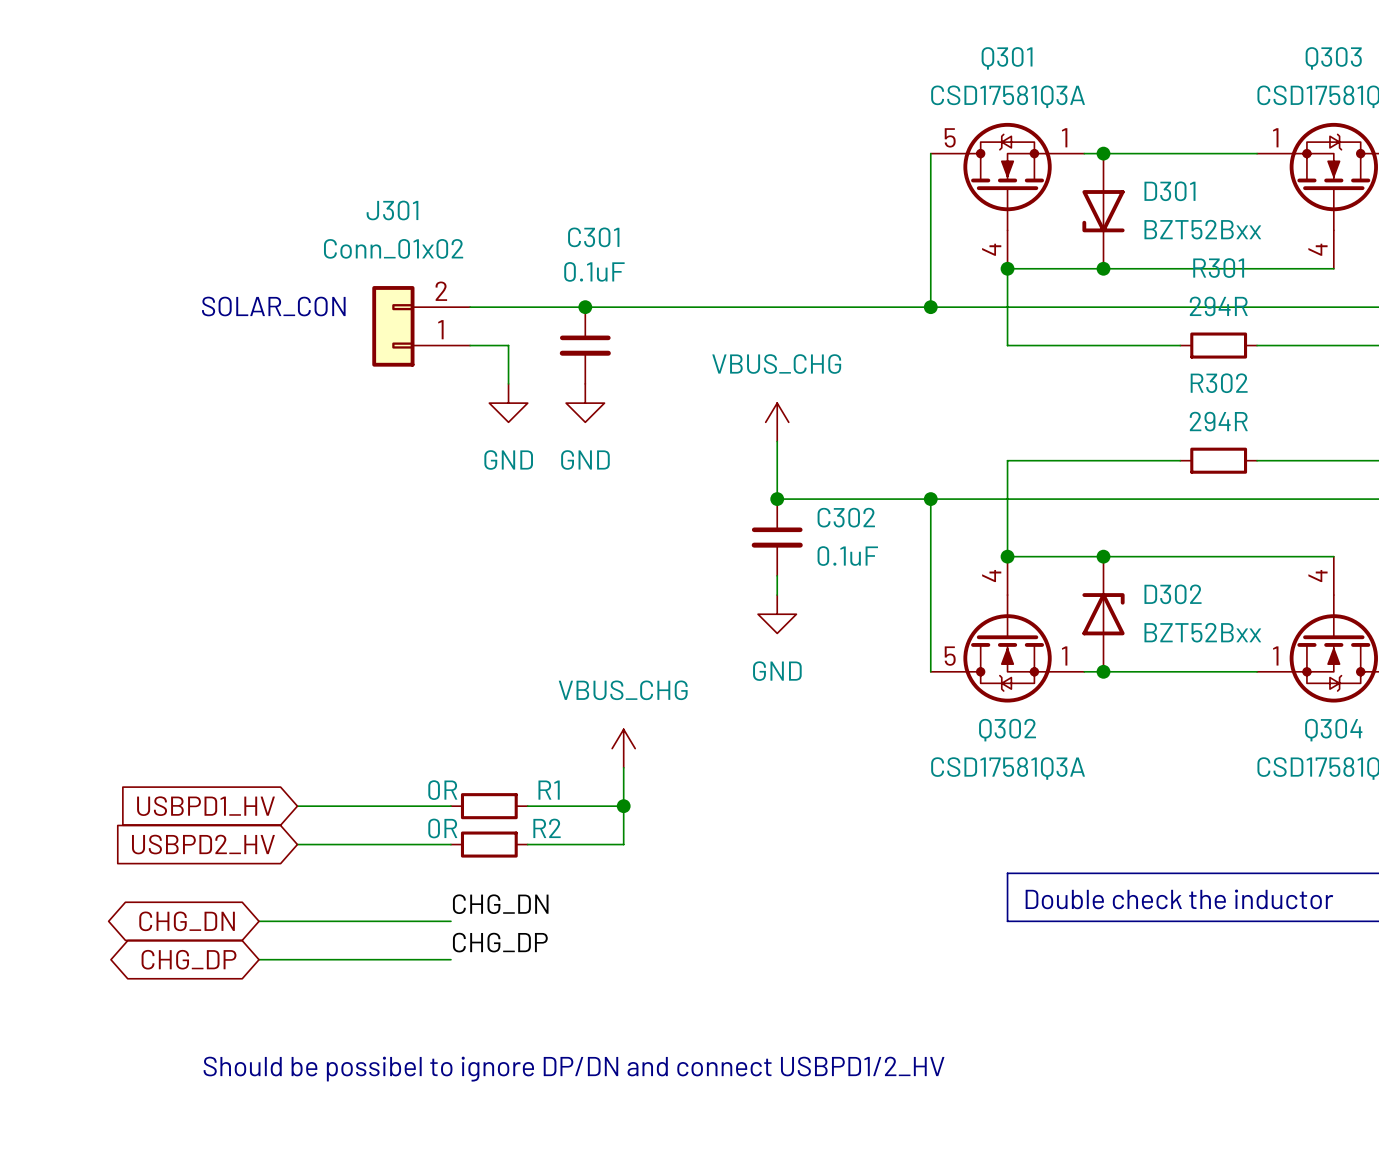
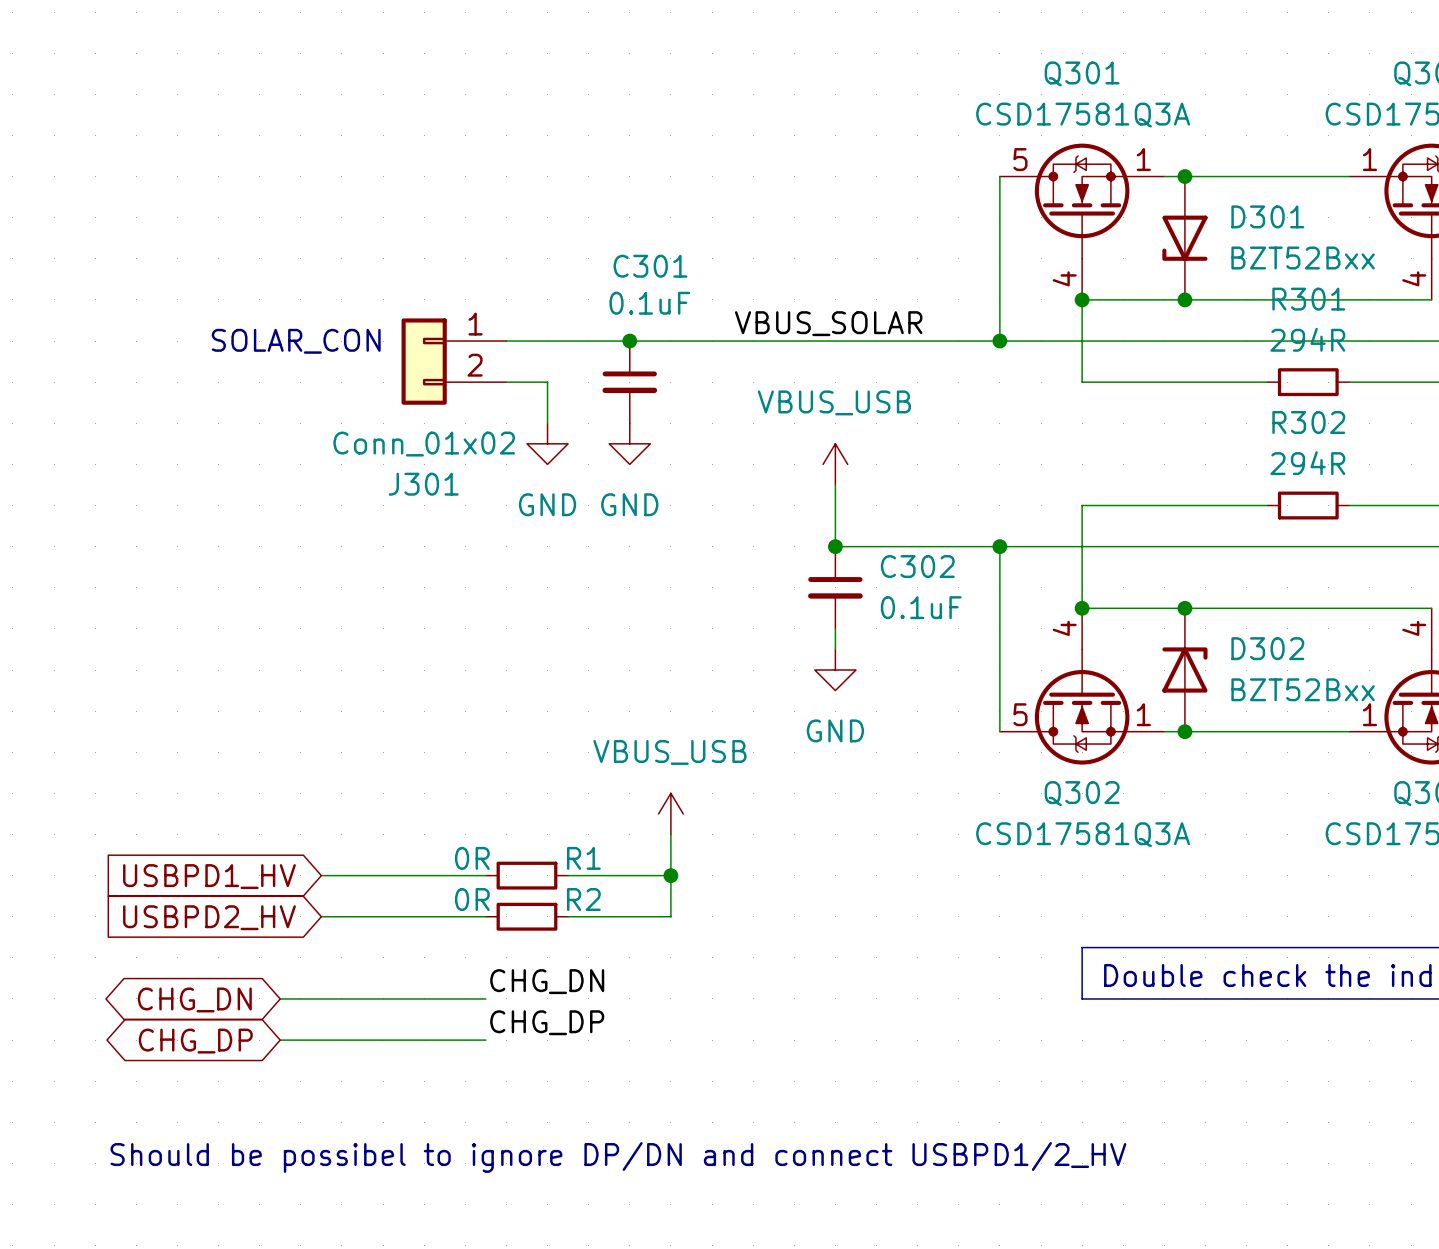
label: none -> VBUS_SOLAR (828, 323)
J301 flip: as is (393, 326) -> up-down (424, 361)
power symbol: VBUS_CHG (777, 422) -> VBUS_USB (835, 464)
power symbol: VBUS_CHG (623, 748) -> VBUS_USB (670, 813)

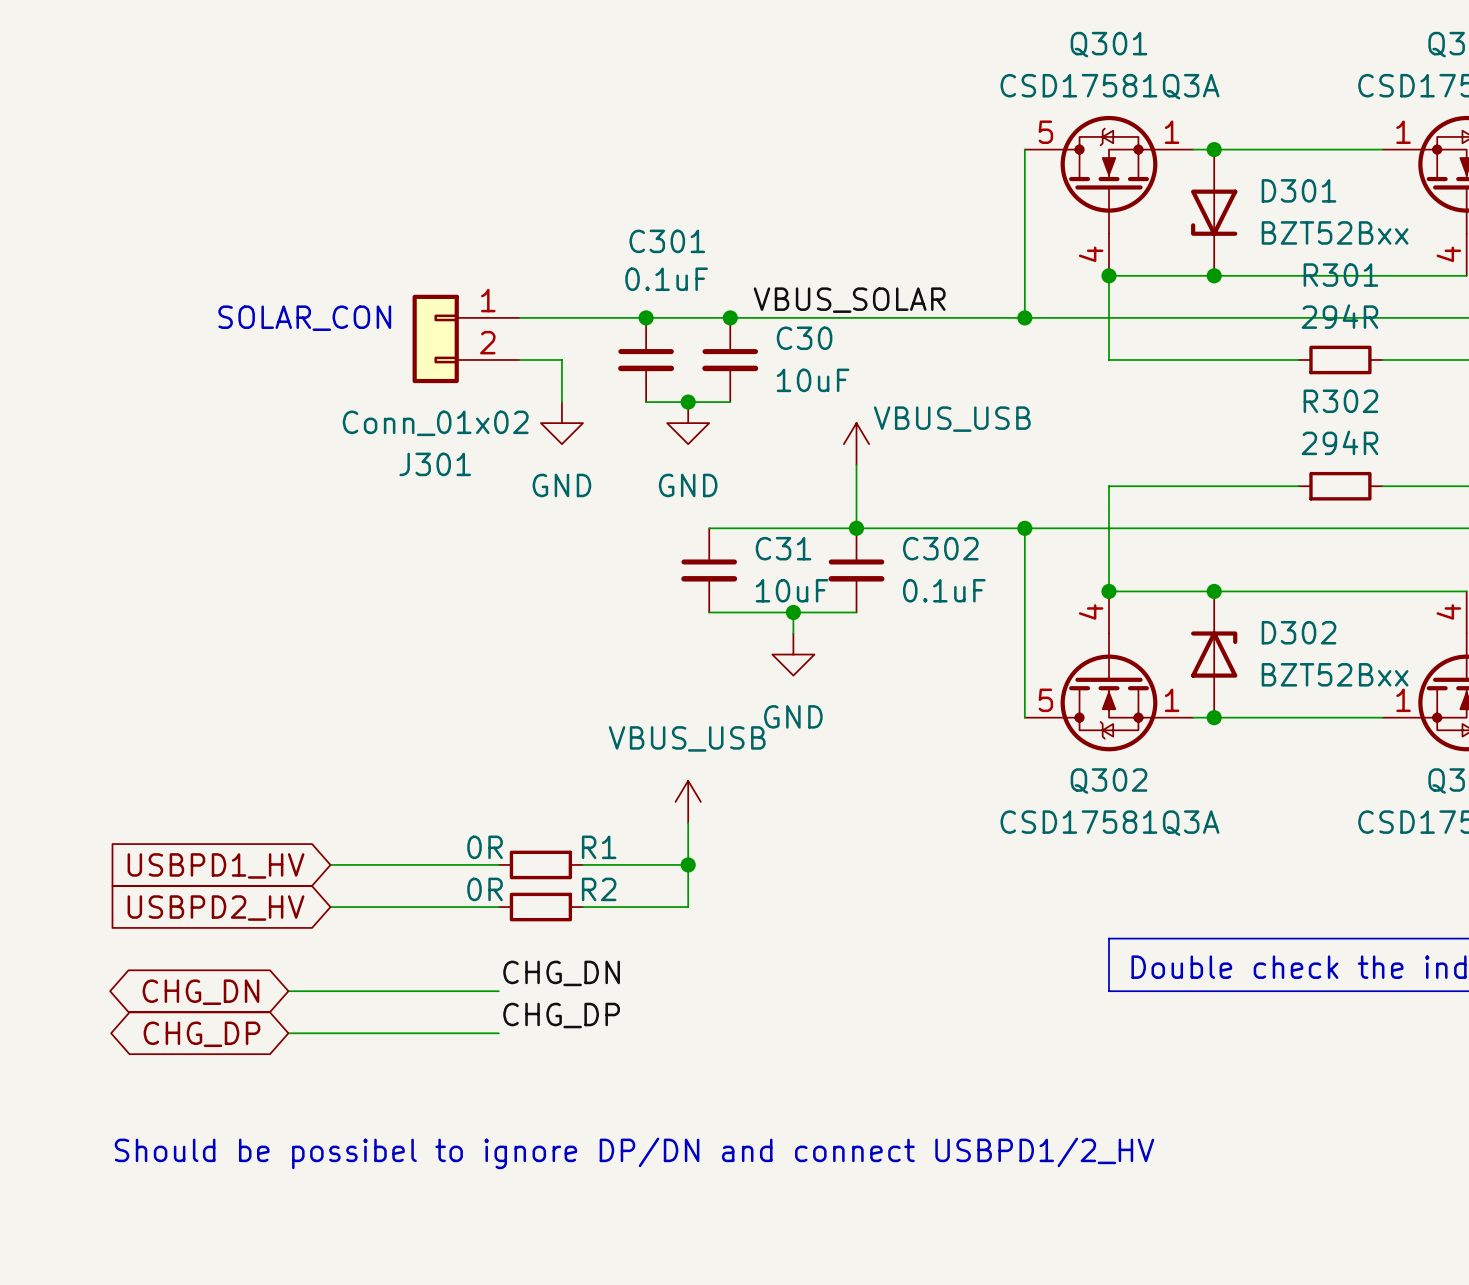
junction: none -> (730, 317)
C30: none -> 10uF (730, 359)
power symbol text position: VBUS_USB (834, 402) -> VBUS_USB (952, 419)
wire: none -> (646, 402) (730, 402)
junction: none -> (688, 402)
power symbol position: GND (629, 443) -> GND (688, 423)
wire: none -> (709, 528) (856, 528)
C31: none -> 10uF (709, 570)
wire: none -> (793, 612) (793, 633)
junction: none -> (793, 612)
wire: (835, 628) (835, 649) -> (856, 612) (709, 612)
power symbol position: GND (835, 670) -> GND (793, 654)

